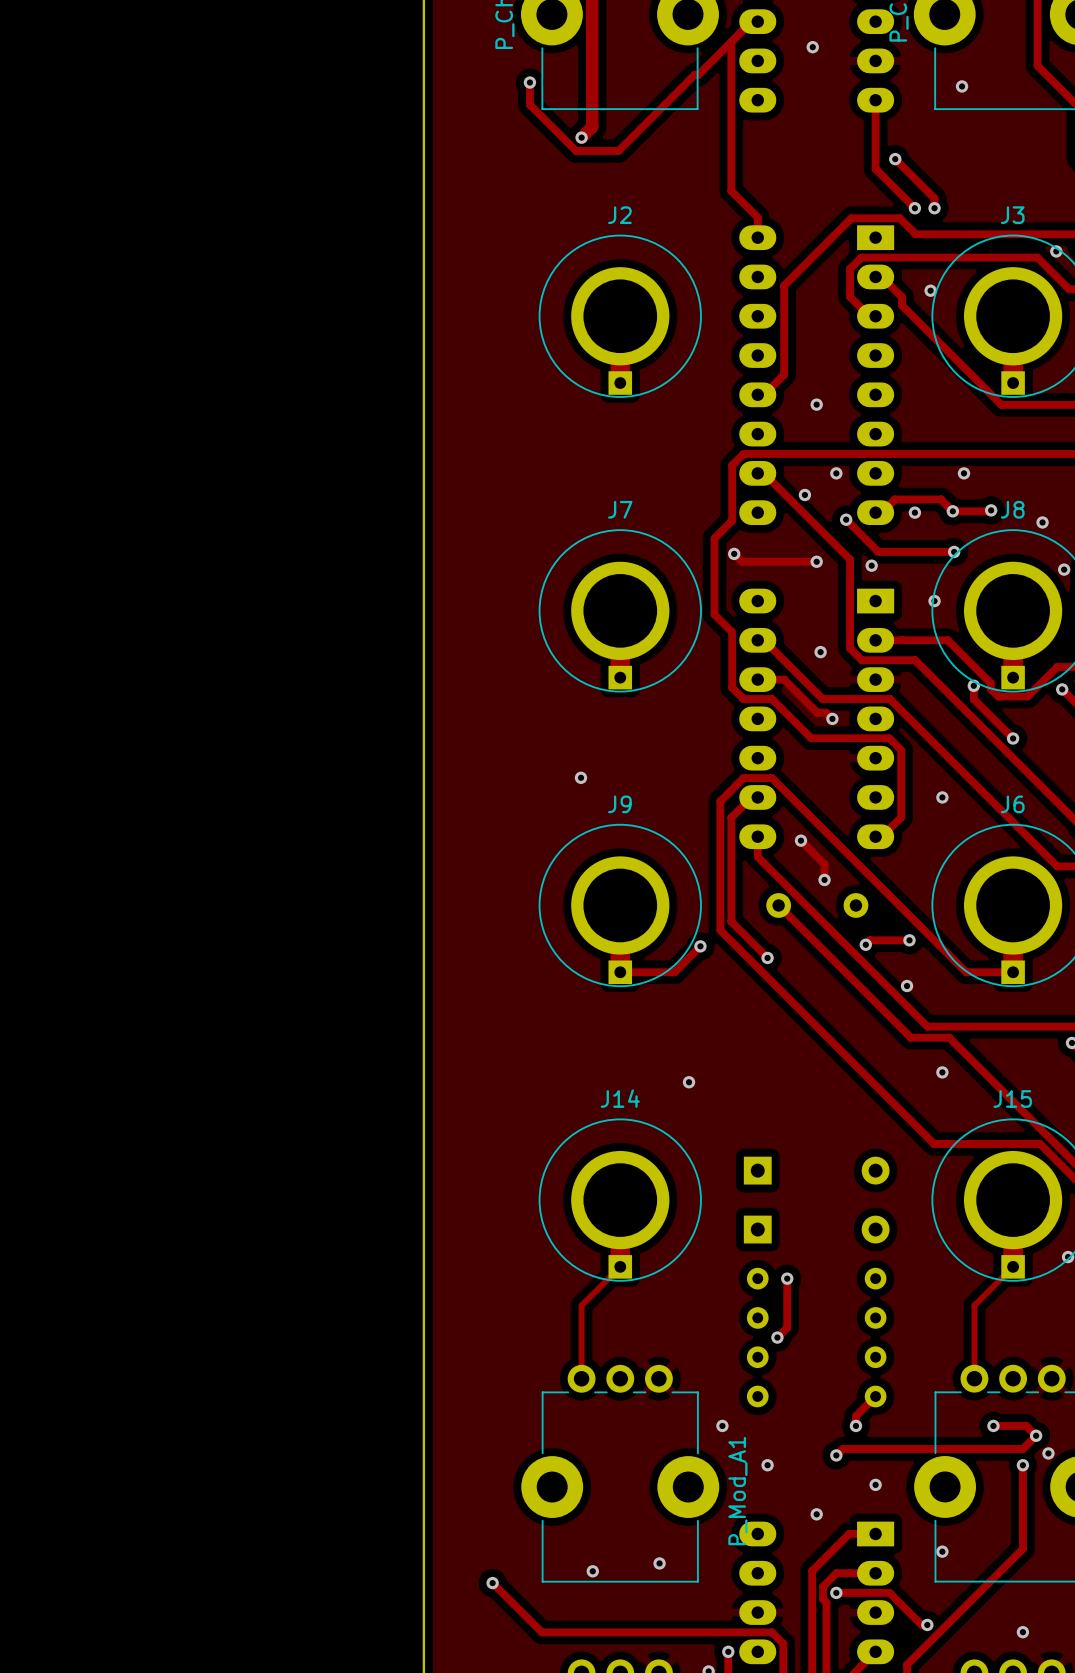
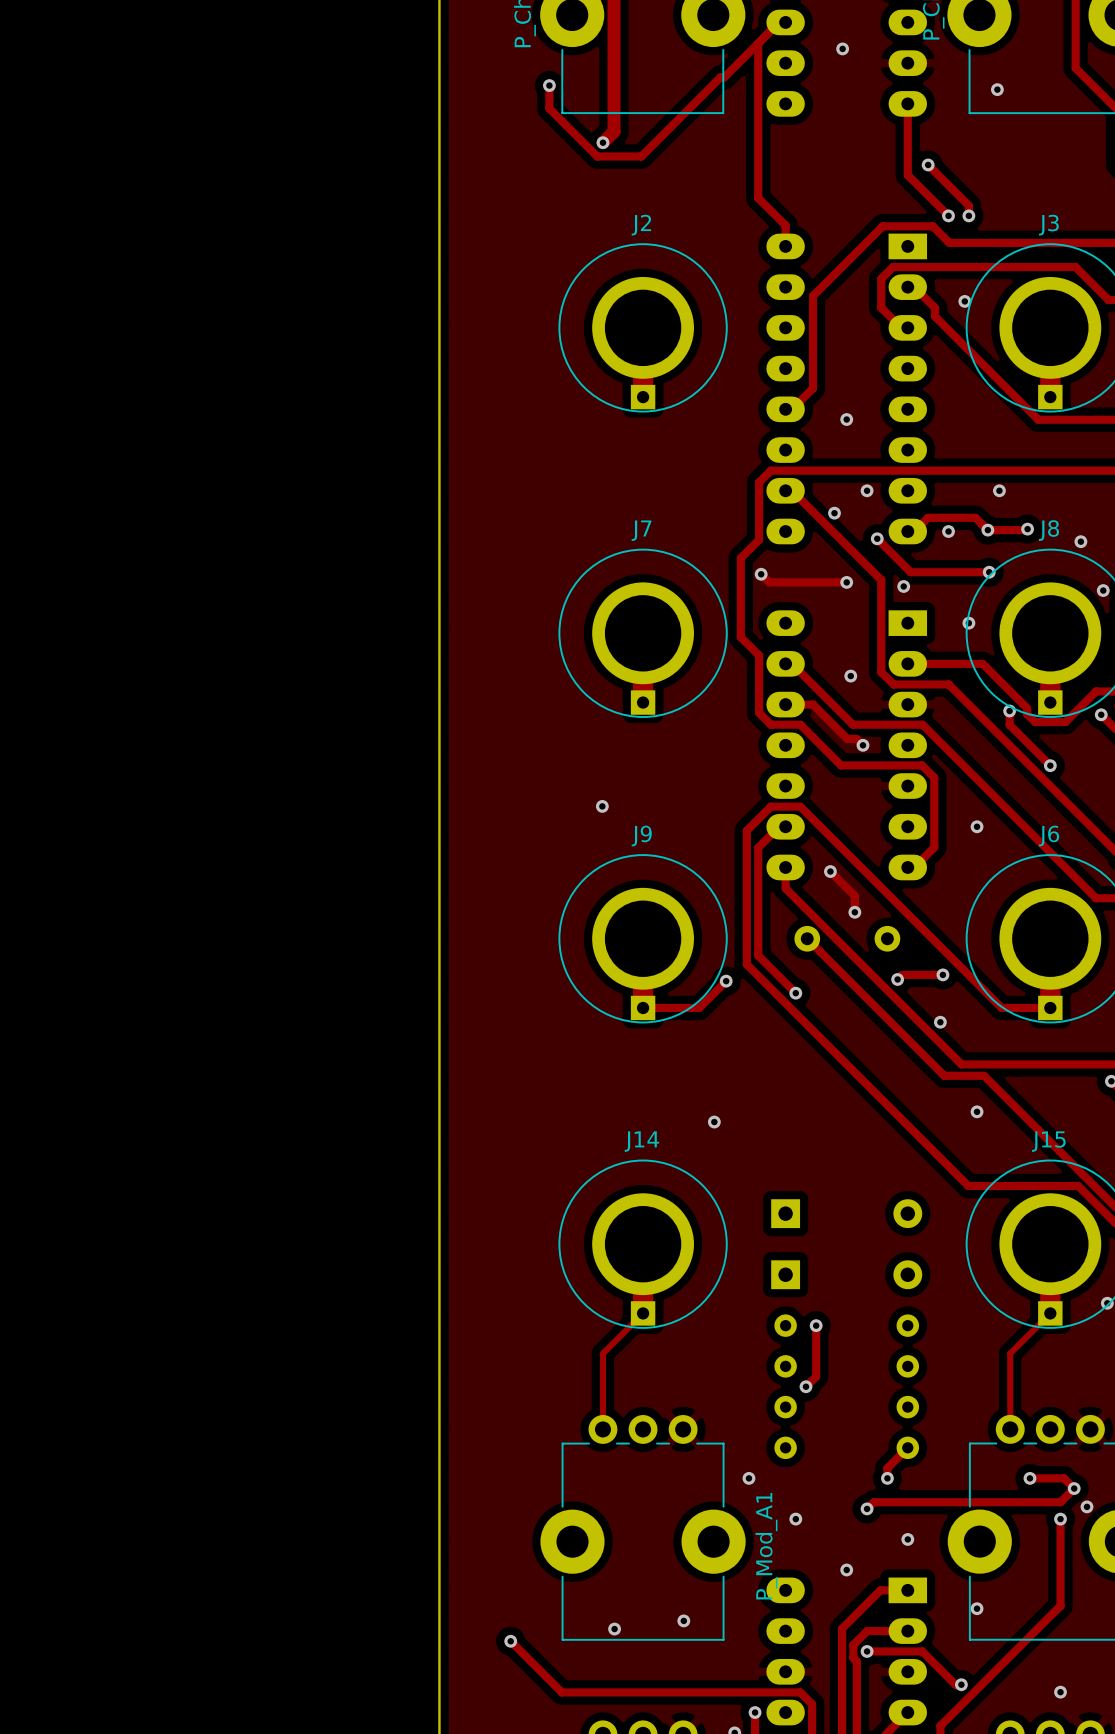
via: (1056, 251) -> none

